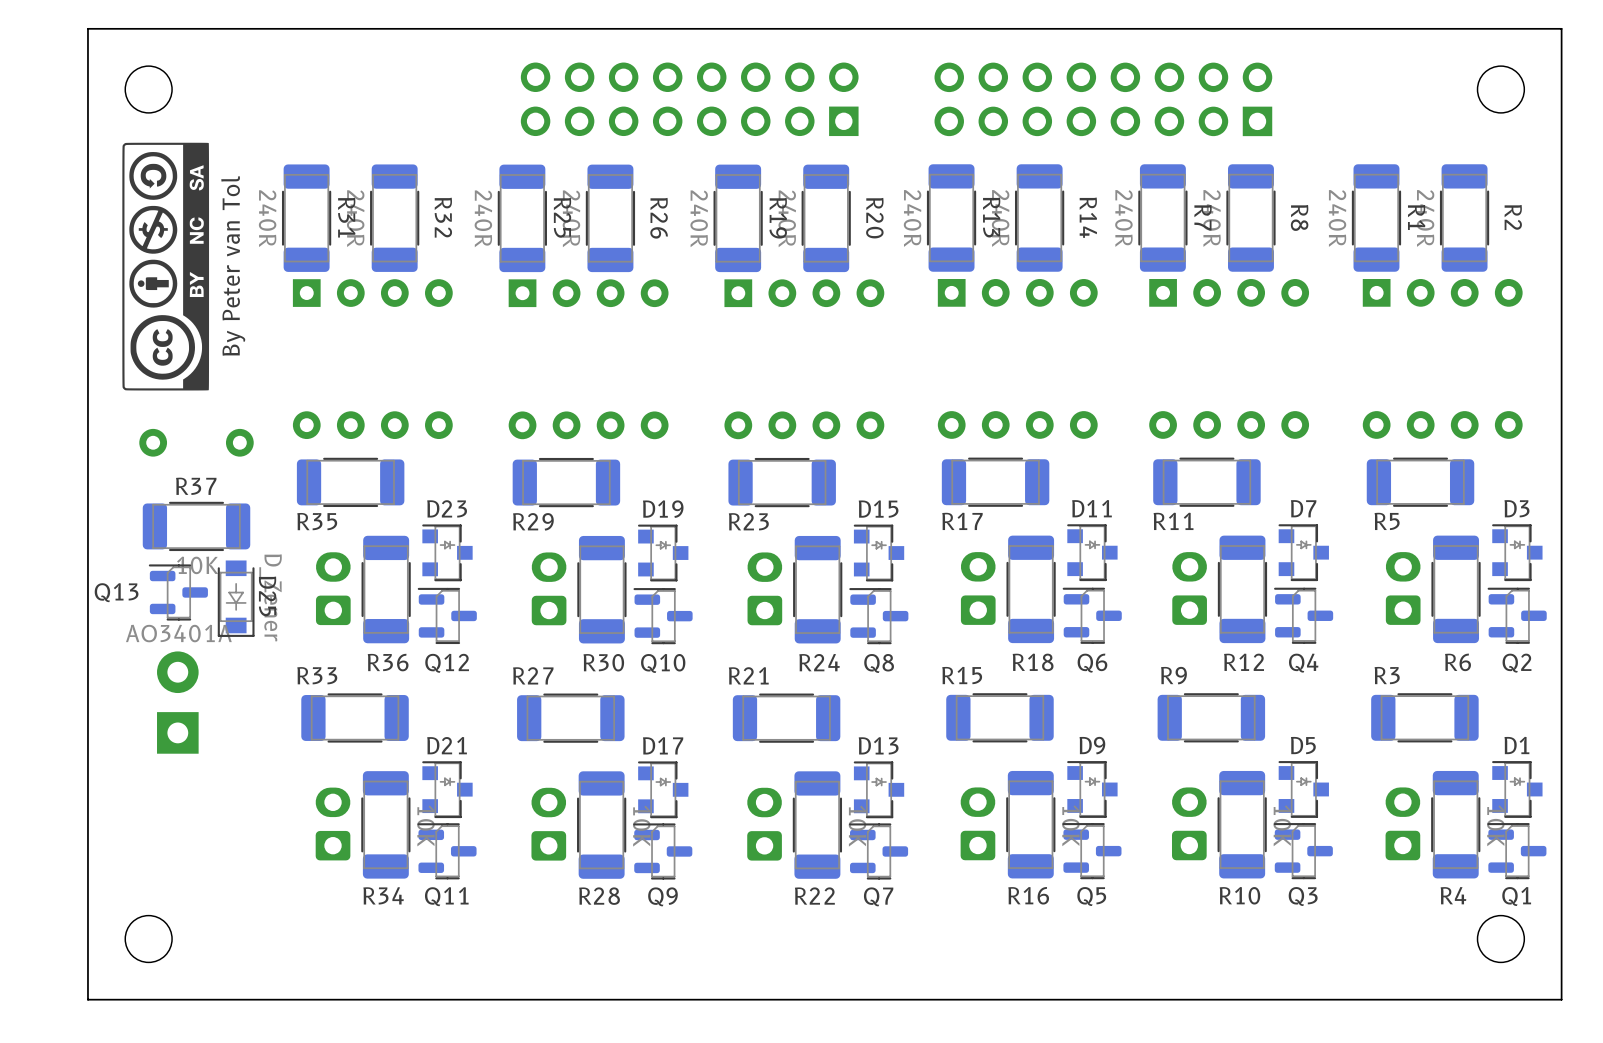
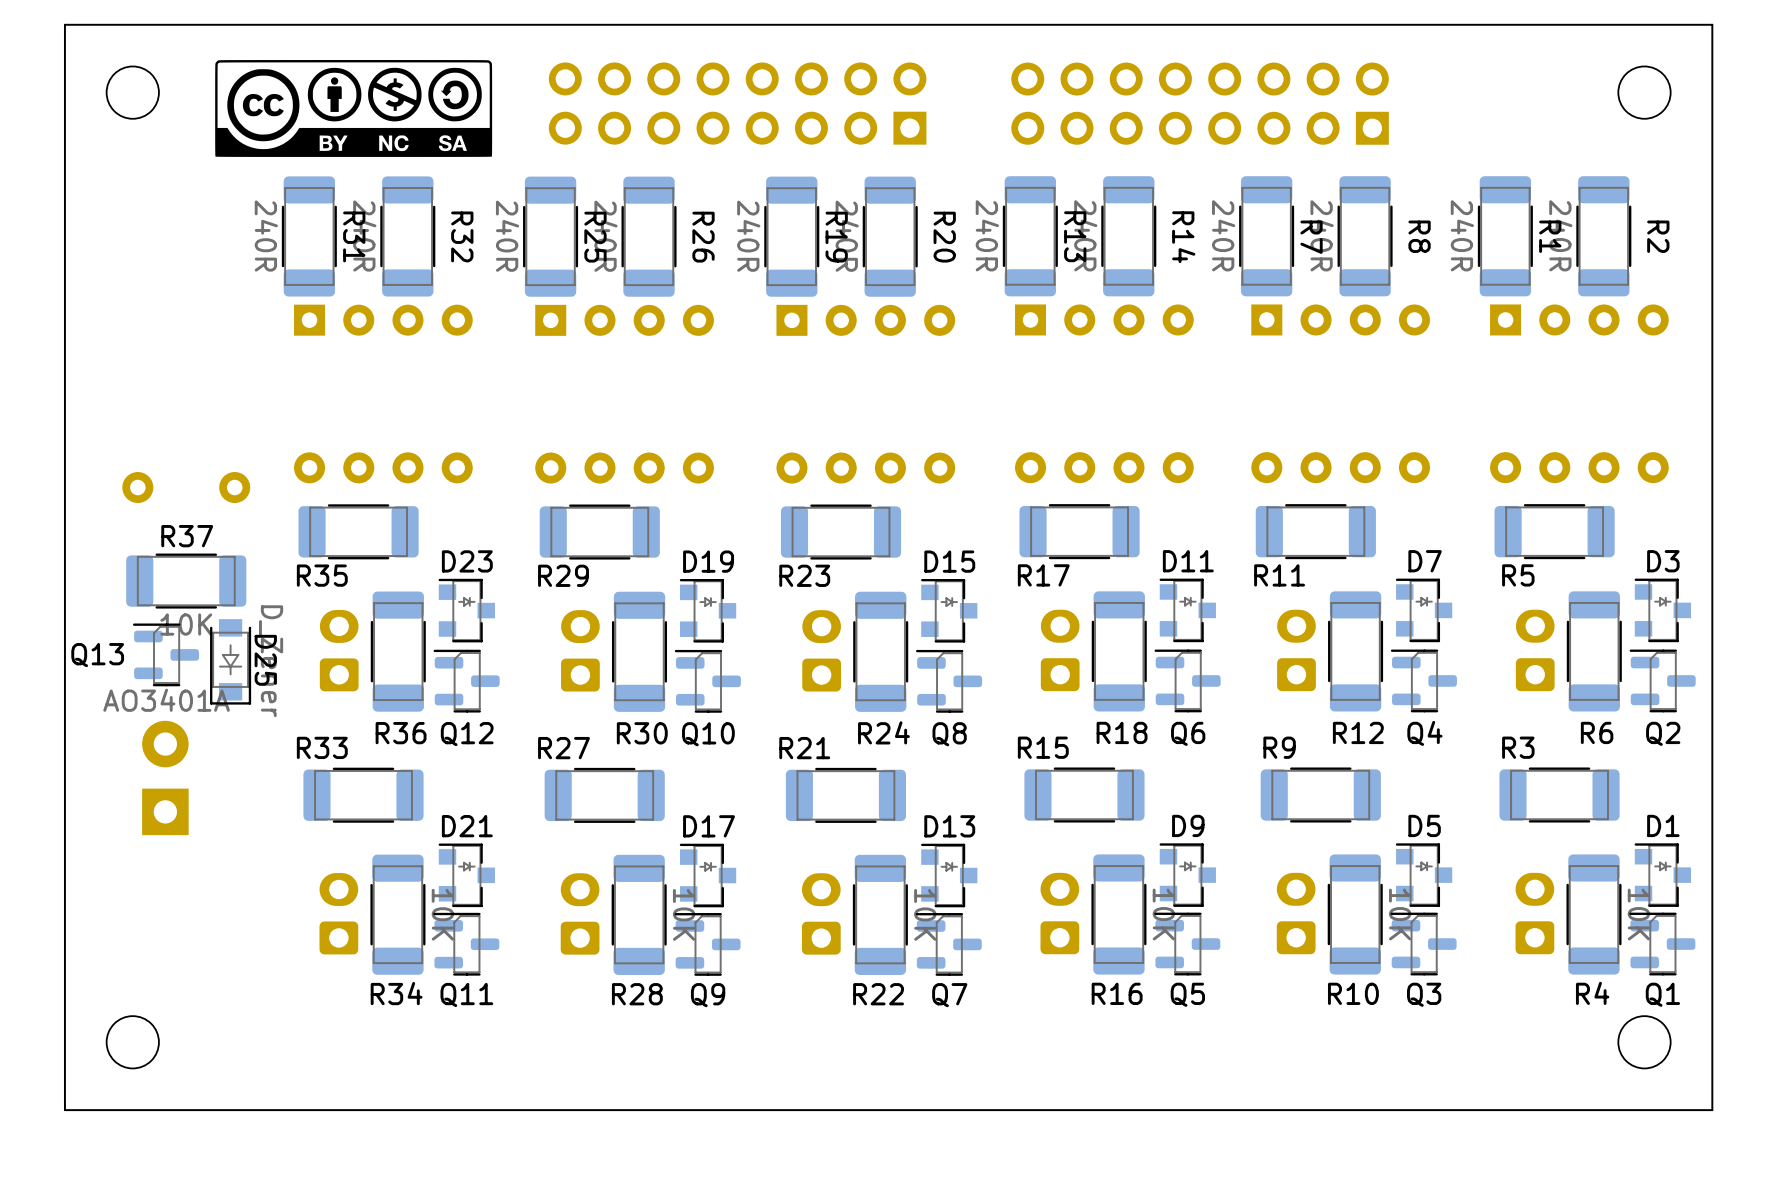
drawing: none -> [215, 60, 493, 157]
drawing: [122, 142, 210, 391] -> none
text: By Peter van Tol (233, 265) -> none

